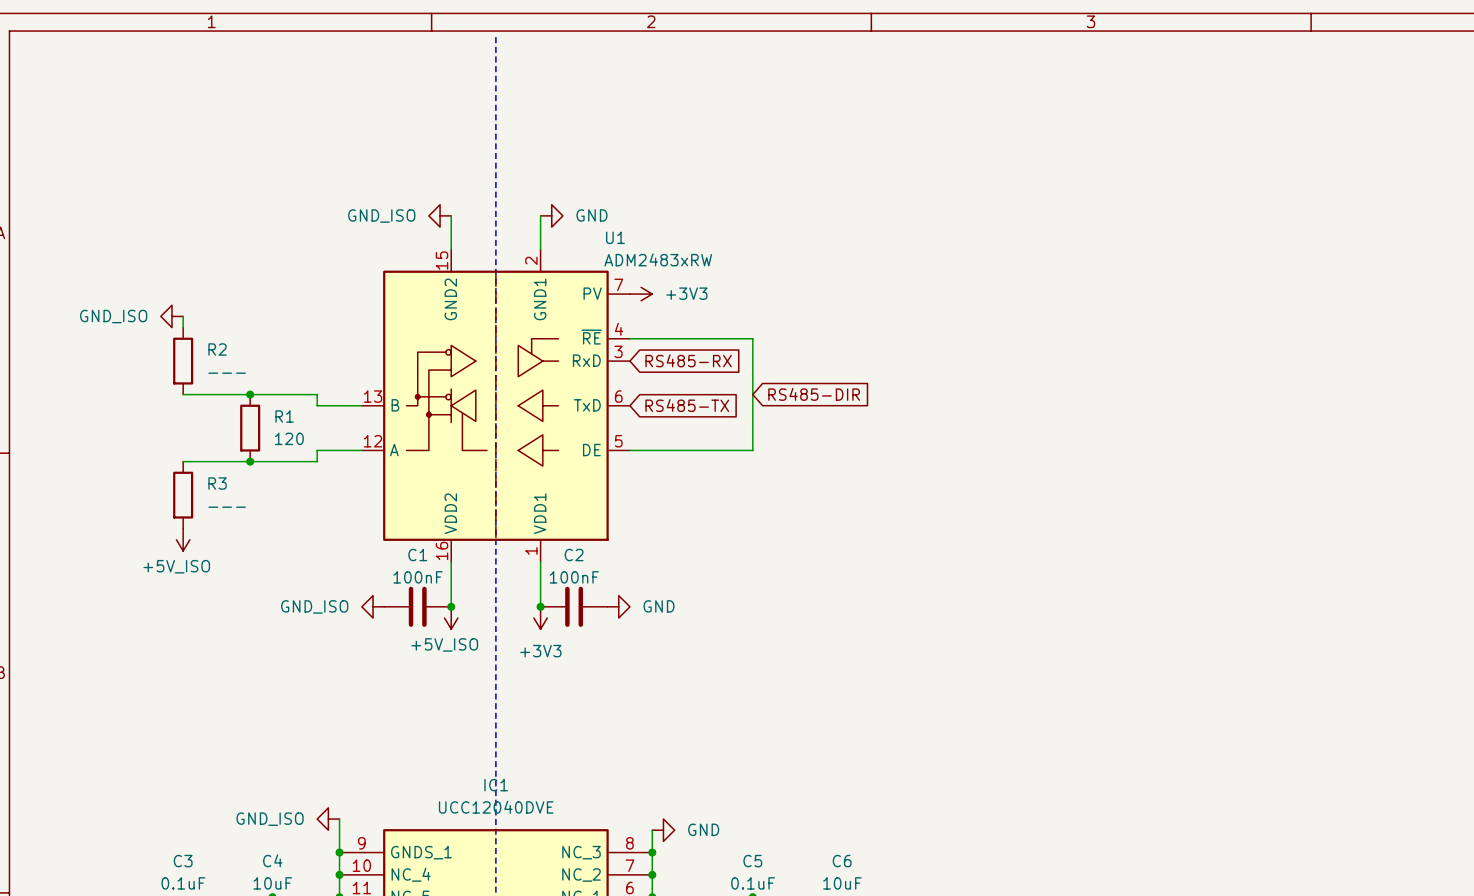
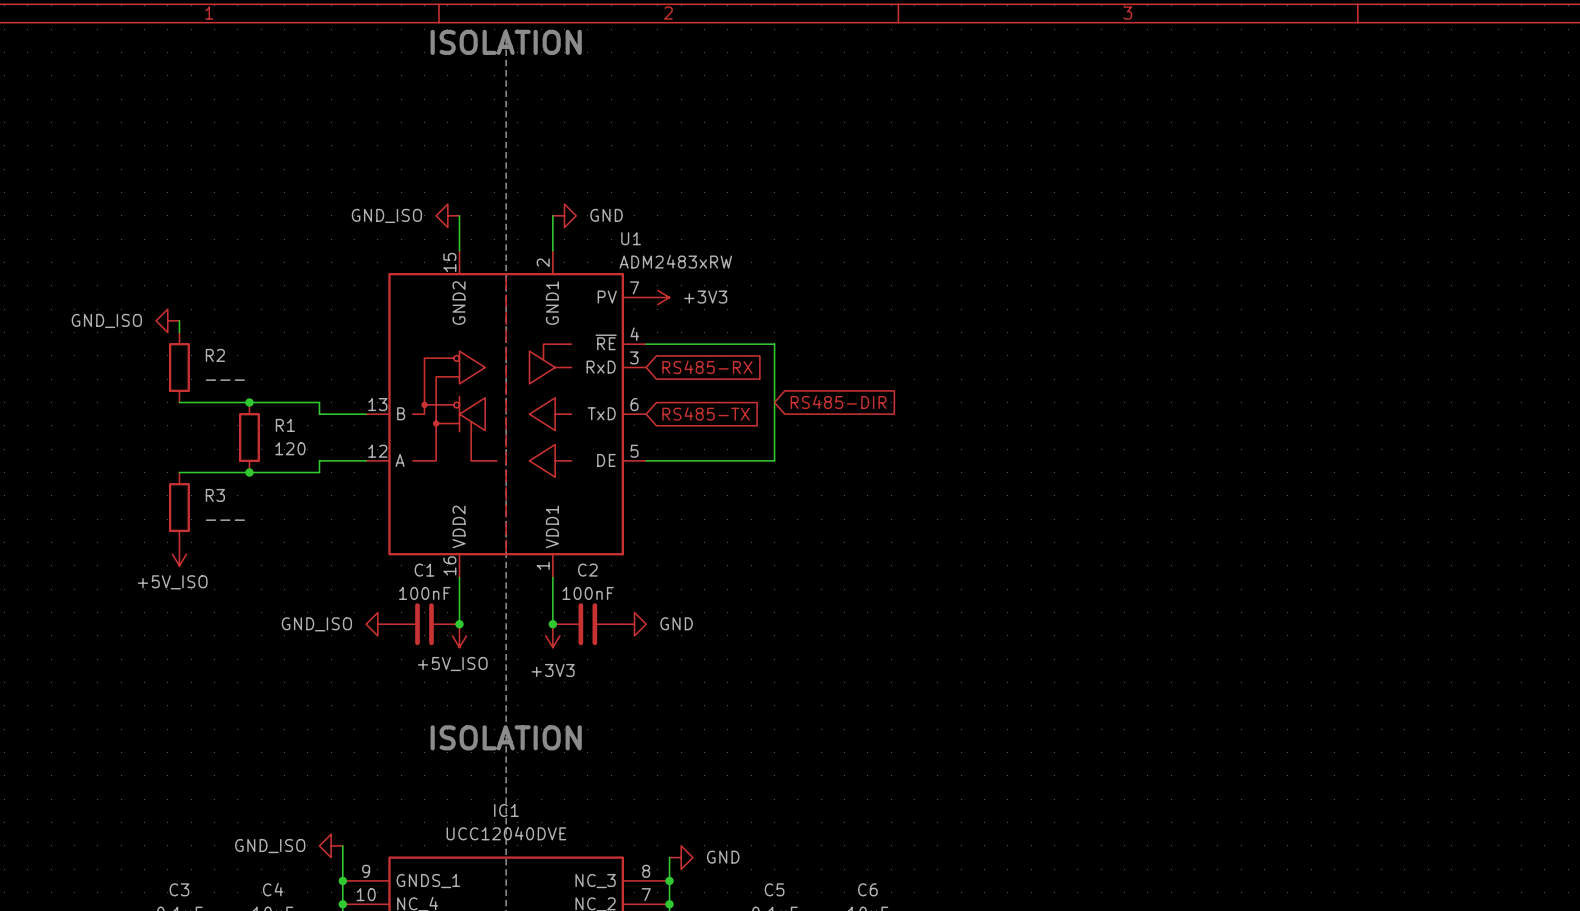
text: none -> ISOLATION (506, 42)
text: none -> ISOLATION (506, 737)

